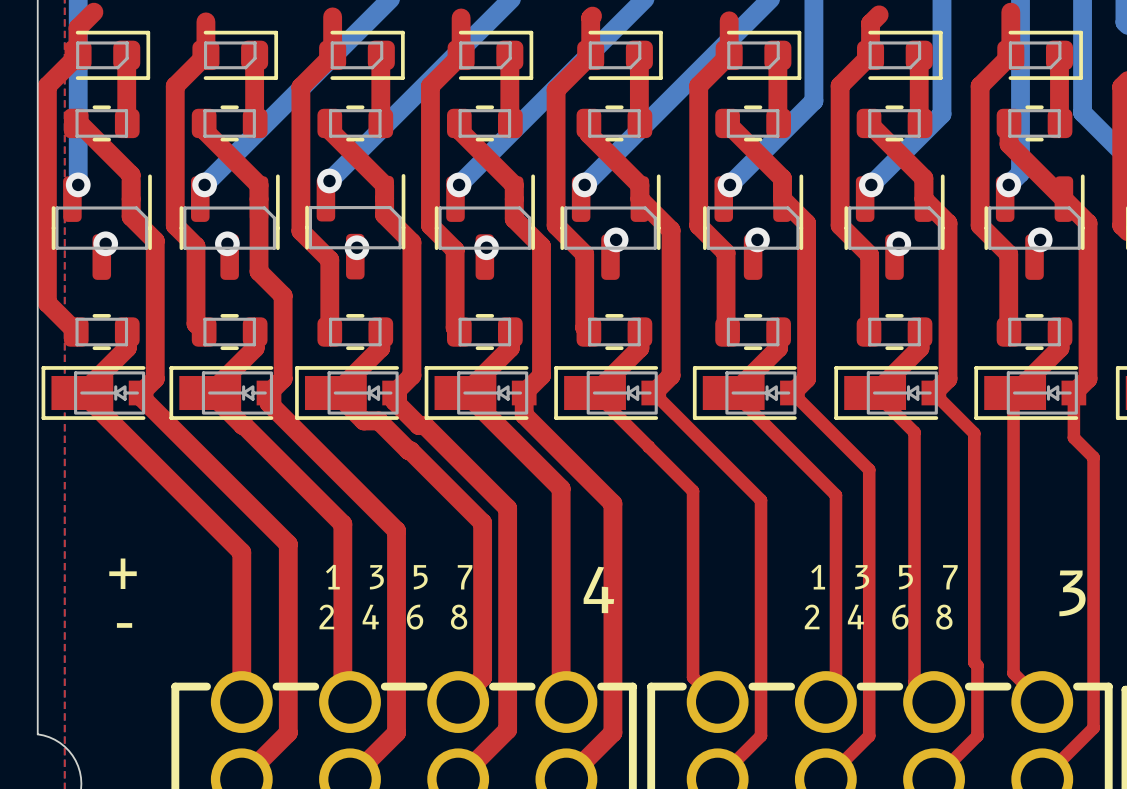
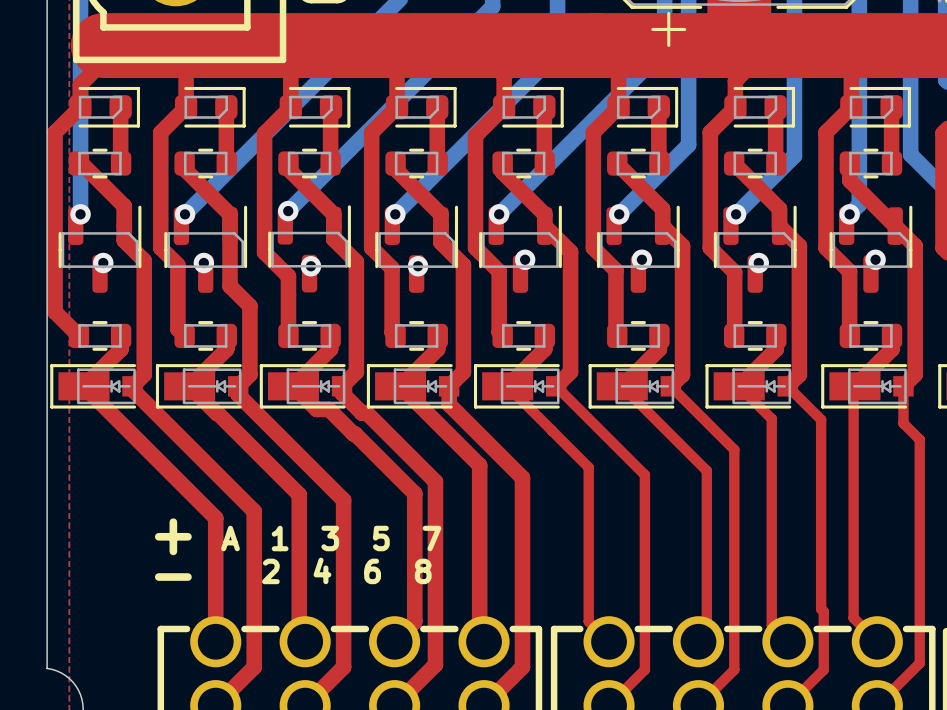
text position: + (123, 573) -> + (173, 536)
text: 1 3 5 7 (399, 577) -> A 1 3 5 7 (331, 538)
text: 1 3 5 7 (884, 577) -> none
text: 4 (598, 589) -> none
text: 3 (1072, 593) -> none
text: 2 4 6 8 (878, 617) -> none
text position: - (124, 625) -> - (173, 577)

